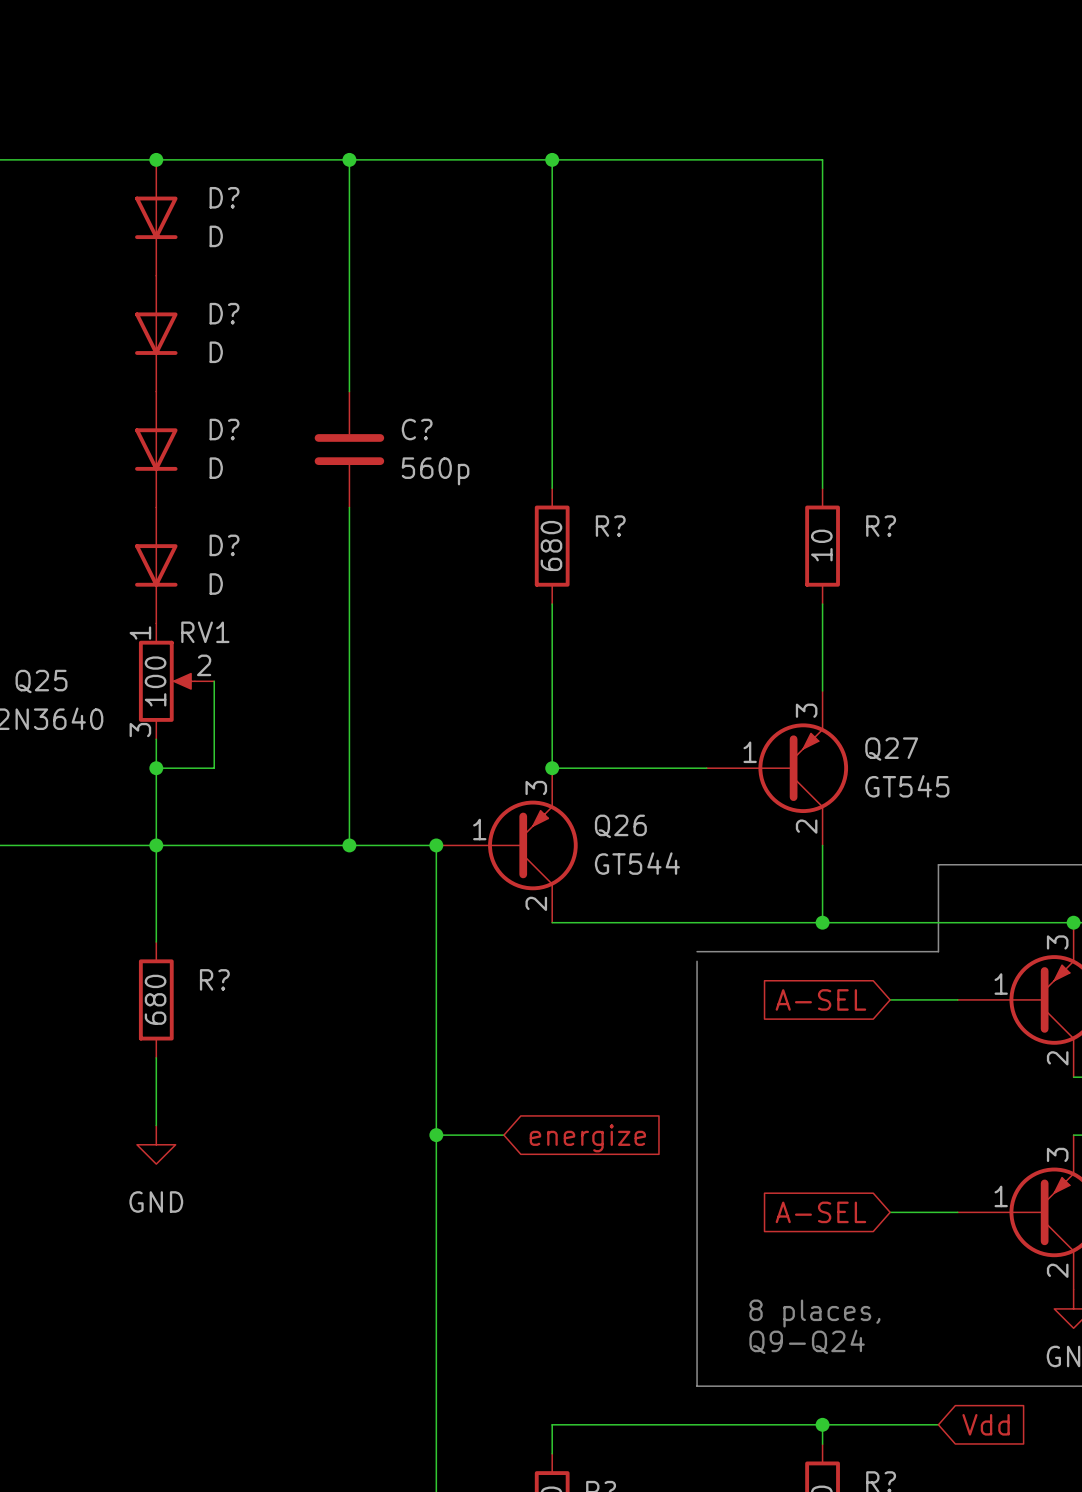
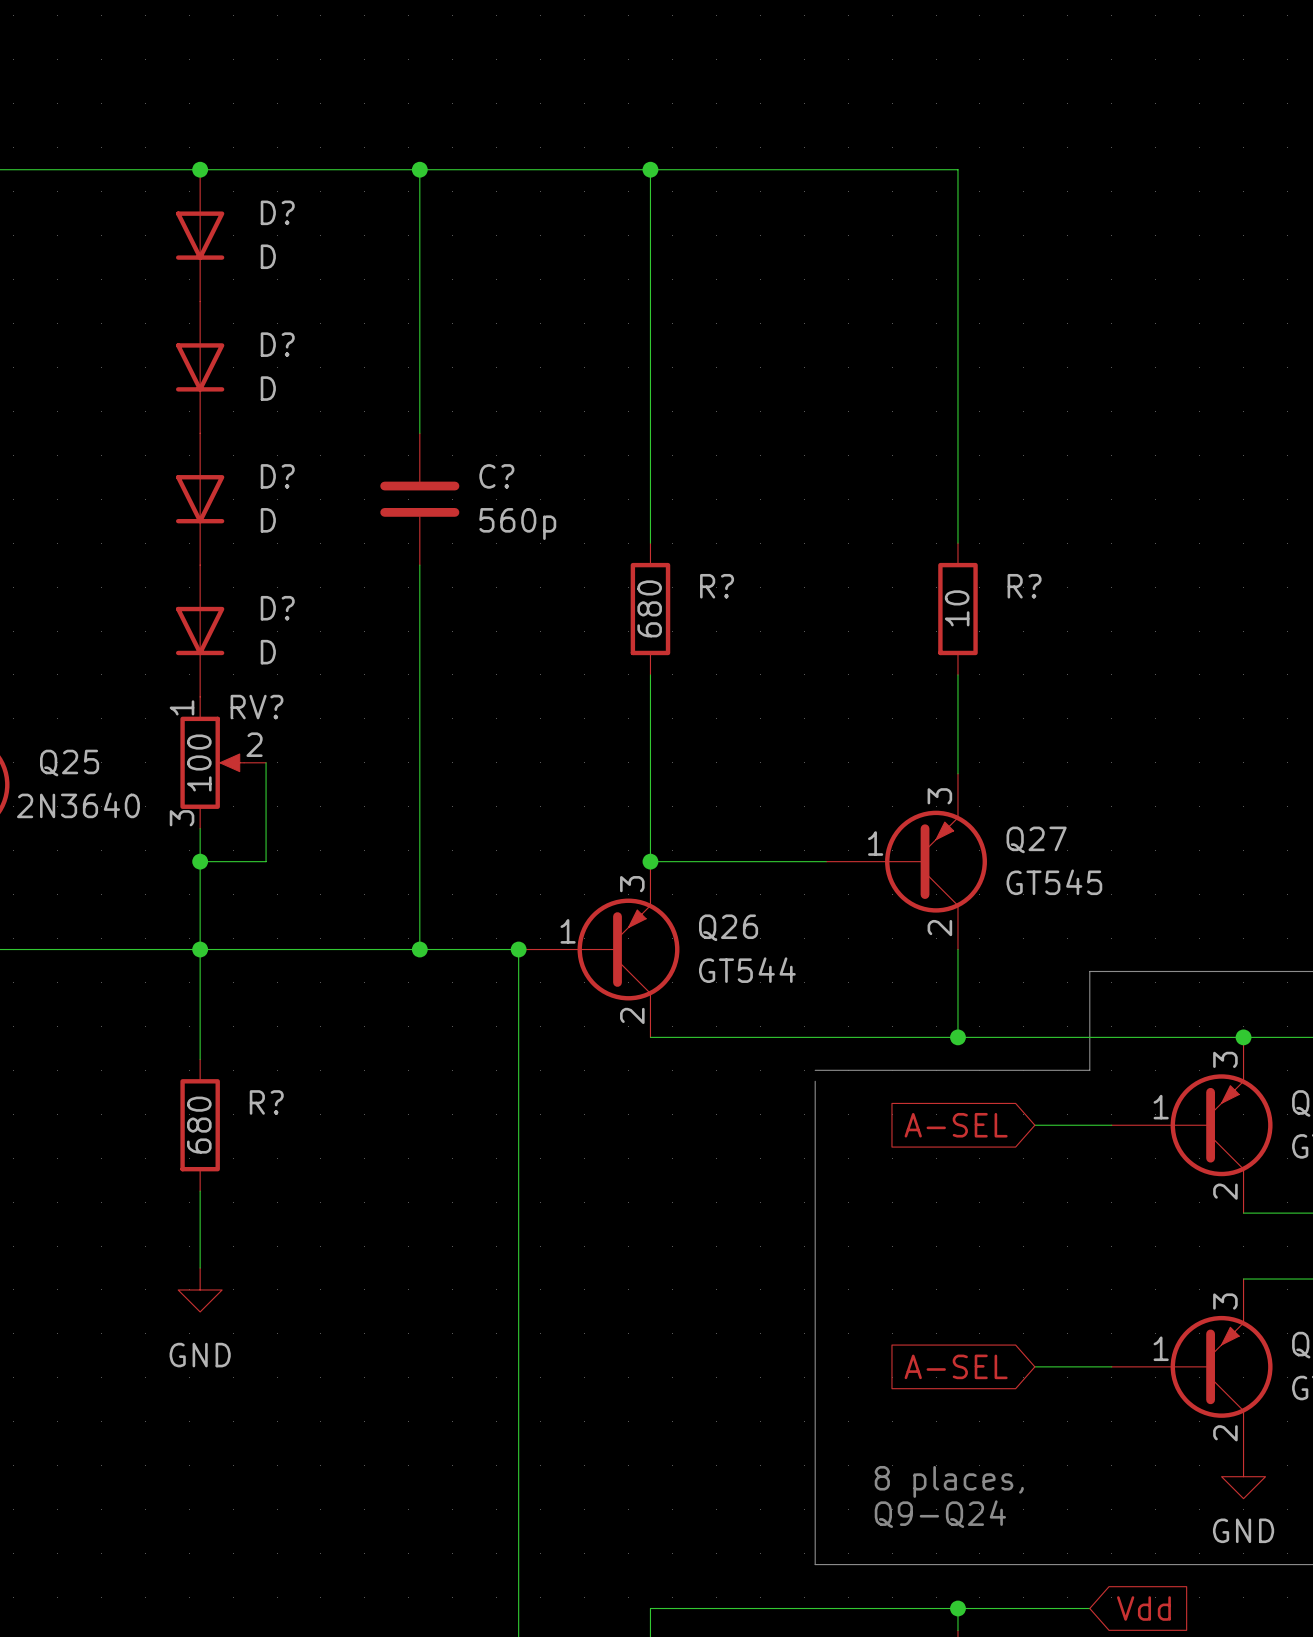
RV1 name: RV1 (205, 632) -> RV? (256, 707)
wire: (436, 1135) (503, 1135) -> none
junction: (436, 1135) -> none
global label: energize (587, 1138) -> none

